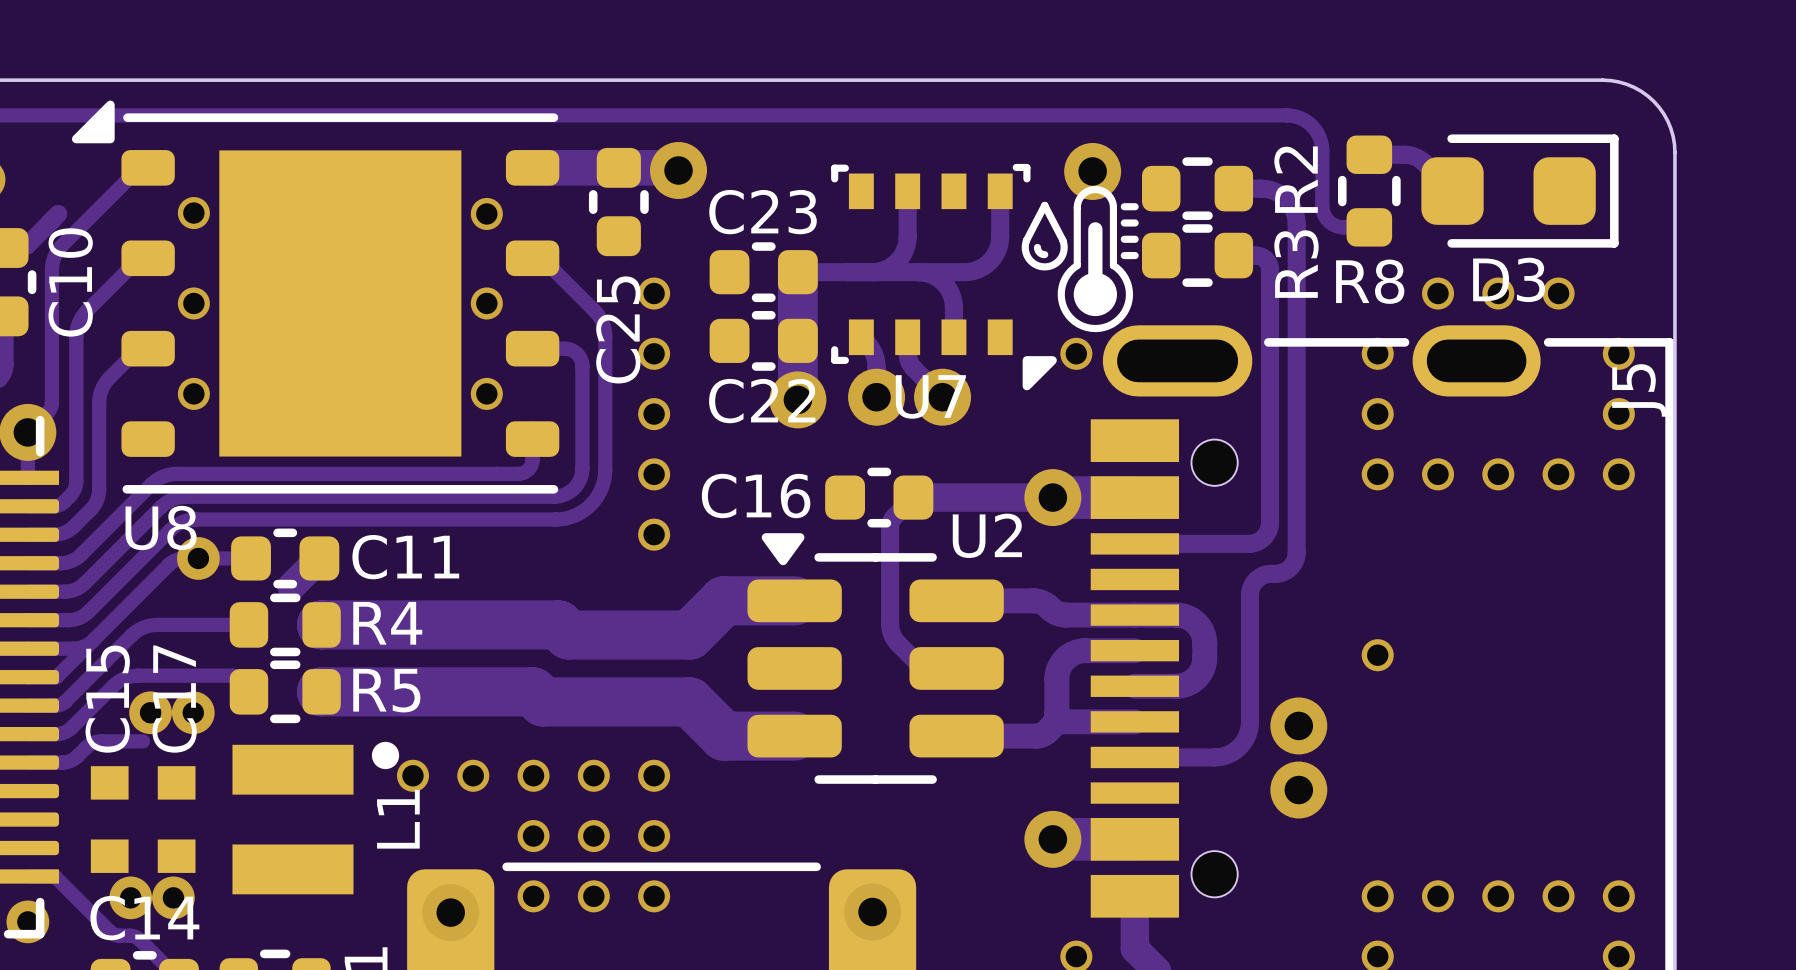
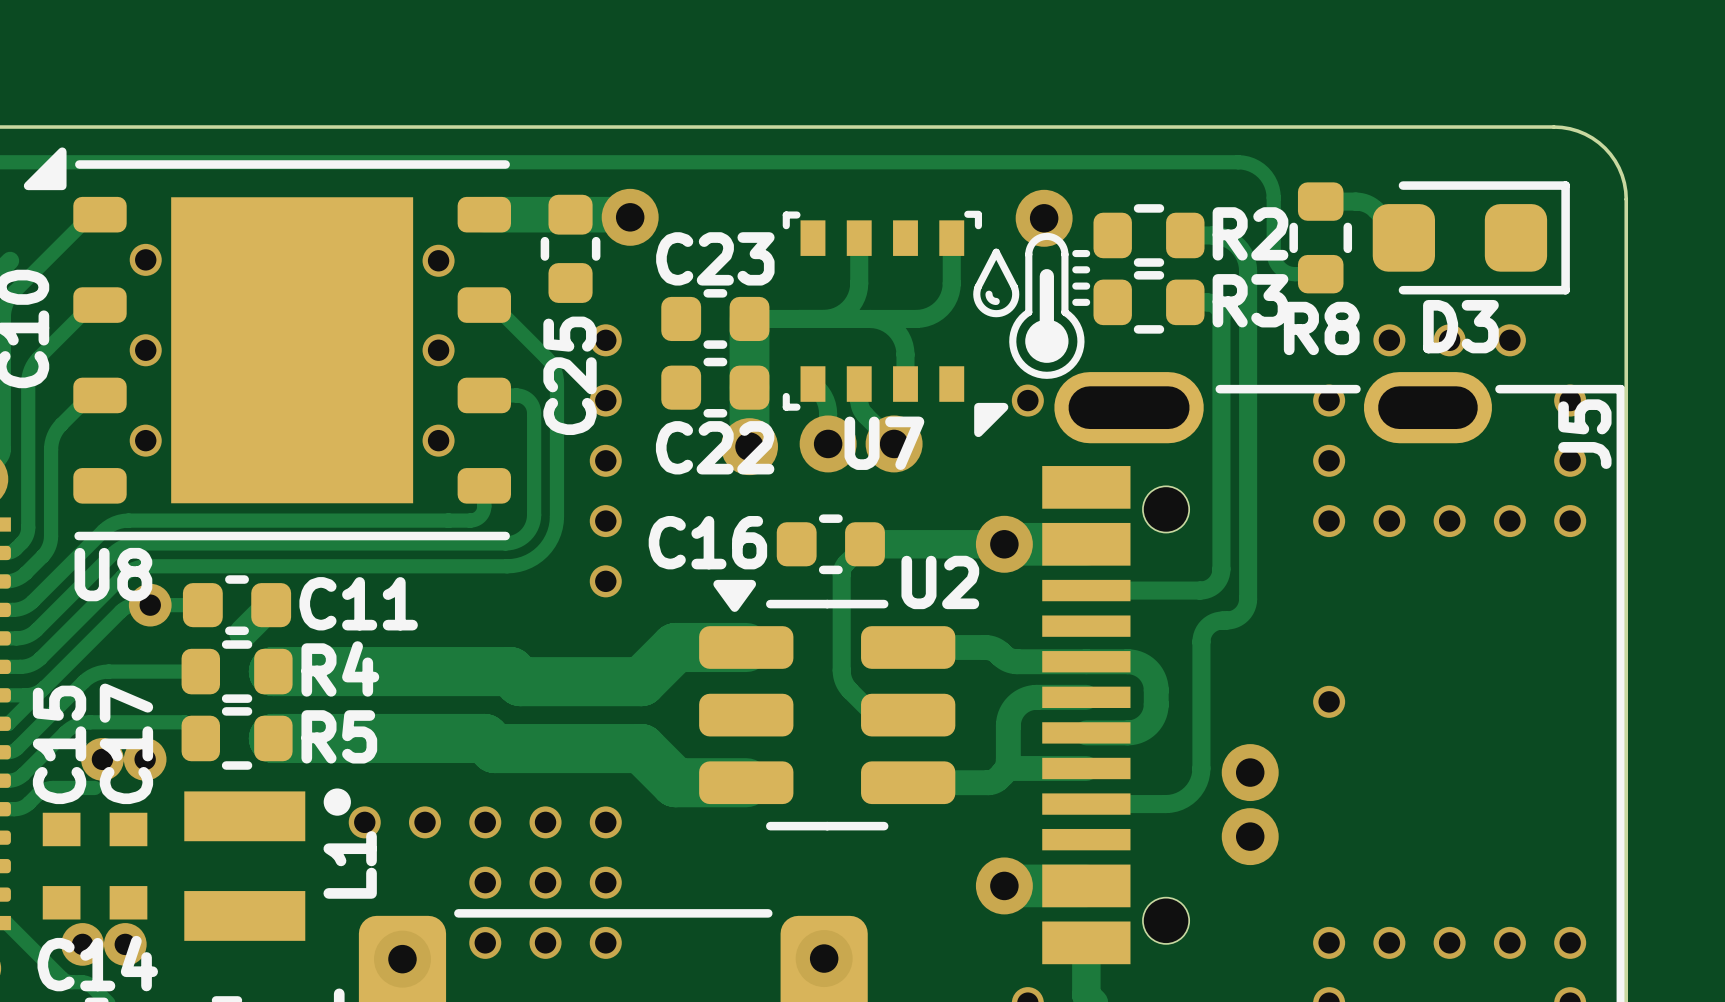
R2 name rotation: 0° (1296, 179) -> 90° clockwise (1250, 233)
R3 name rotation: 0° (1296, 264) -> 90° clockwise (1250, 300)

